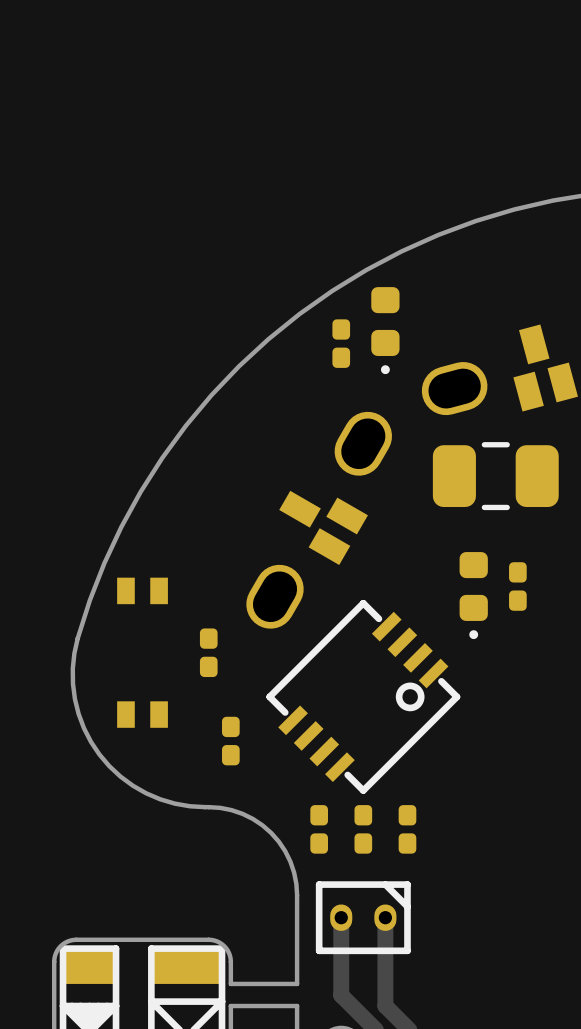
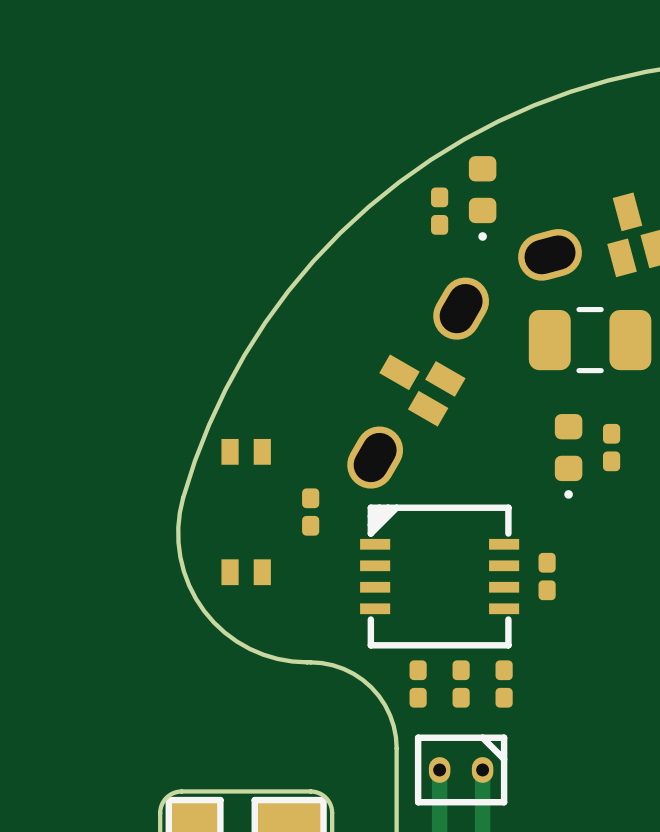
part footprint: [266, 599, 461, 794] -> [360, 504, 520, 649]
part position: (230, 741) -> (547, 576)

